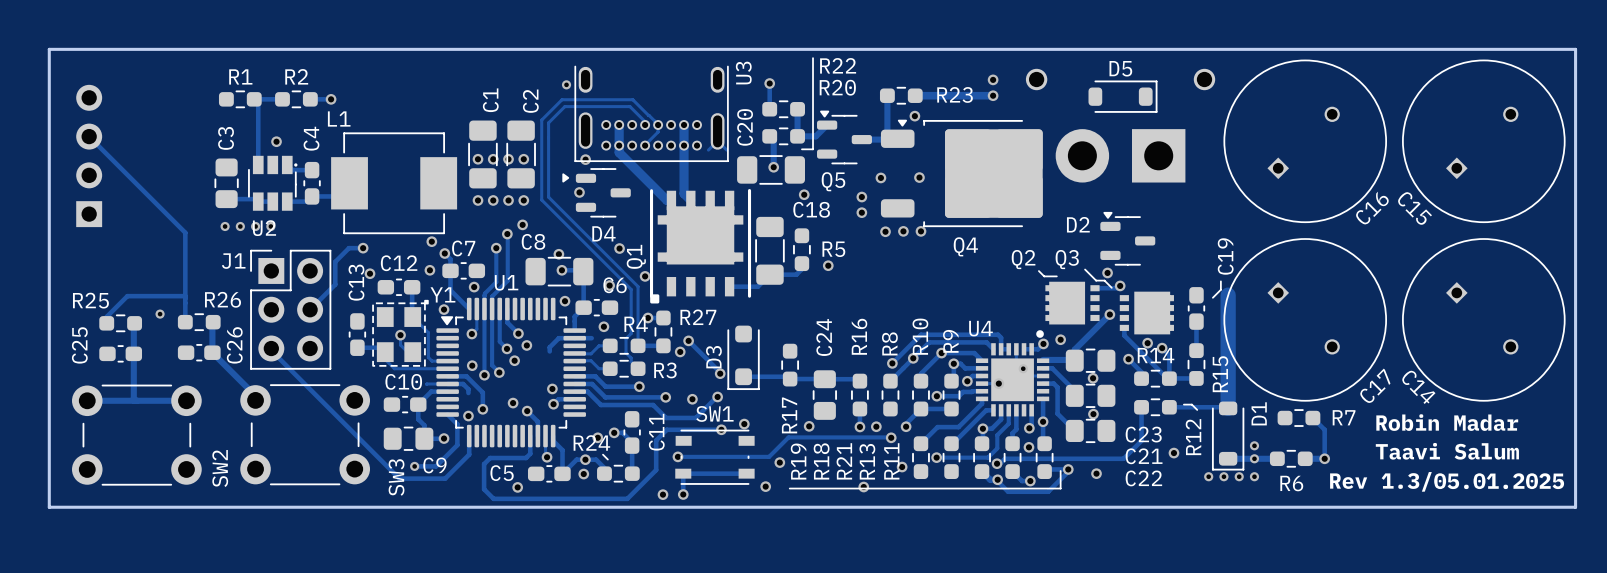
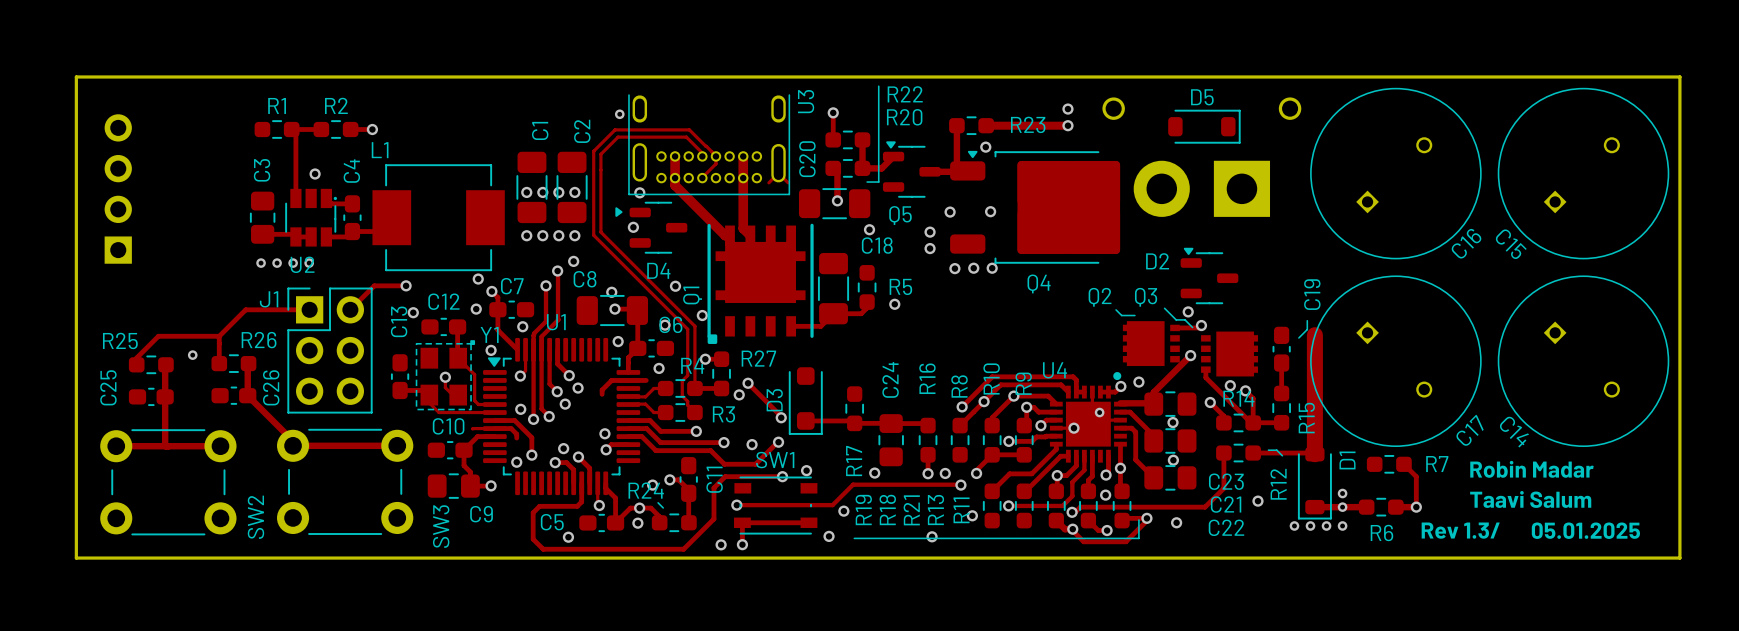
track: (89, 136) (185, 232) (185, 296) -> (309, 309) (245, 309) (219, 336)
track: (349, 248) (335, 261) (335, 284) (310, 309) -> (391, 285) (374, 285) (350, 309)
track: (271, 348) (399, 478) (445, 478) (469, 454) (469, 436) -> none
track: none -> (293, 445) (397, 445)
track: (447, 414) (457, 424) (457, 445) (436, 466) (414, 466) -> none
track: none -> (555, 462) (566, 462) (573, 469) (573, 483)
via: none -> (555, 462)
via: (414, 466) -> none

